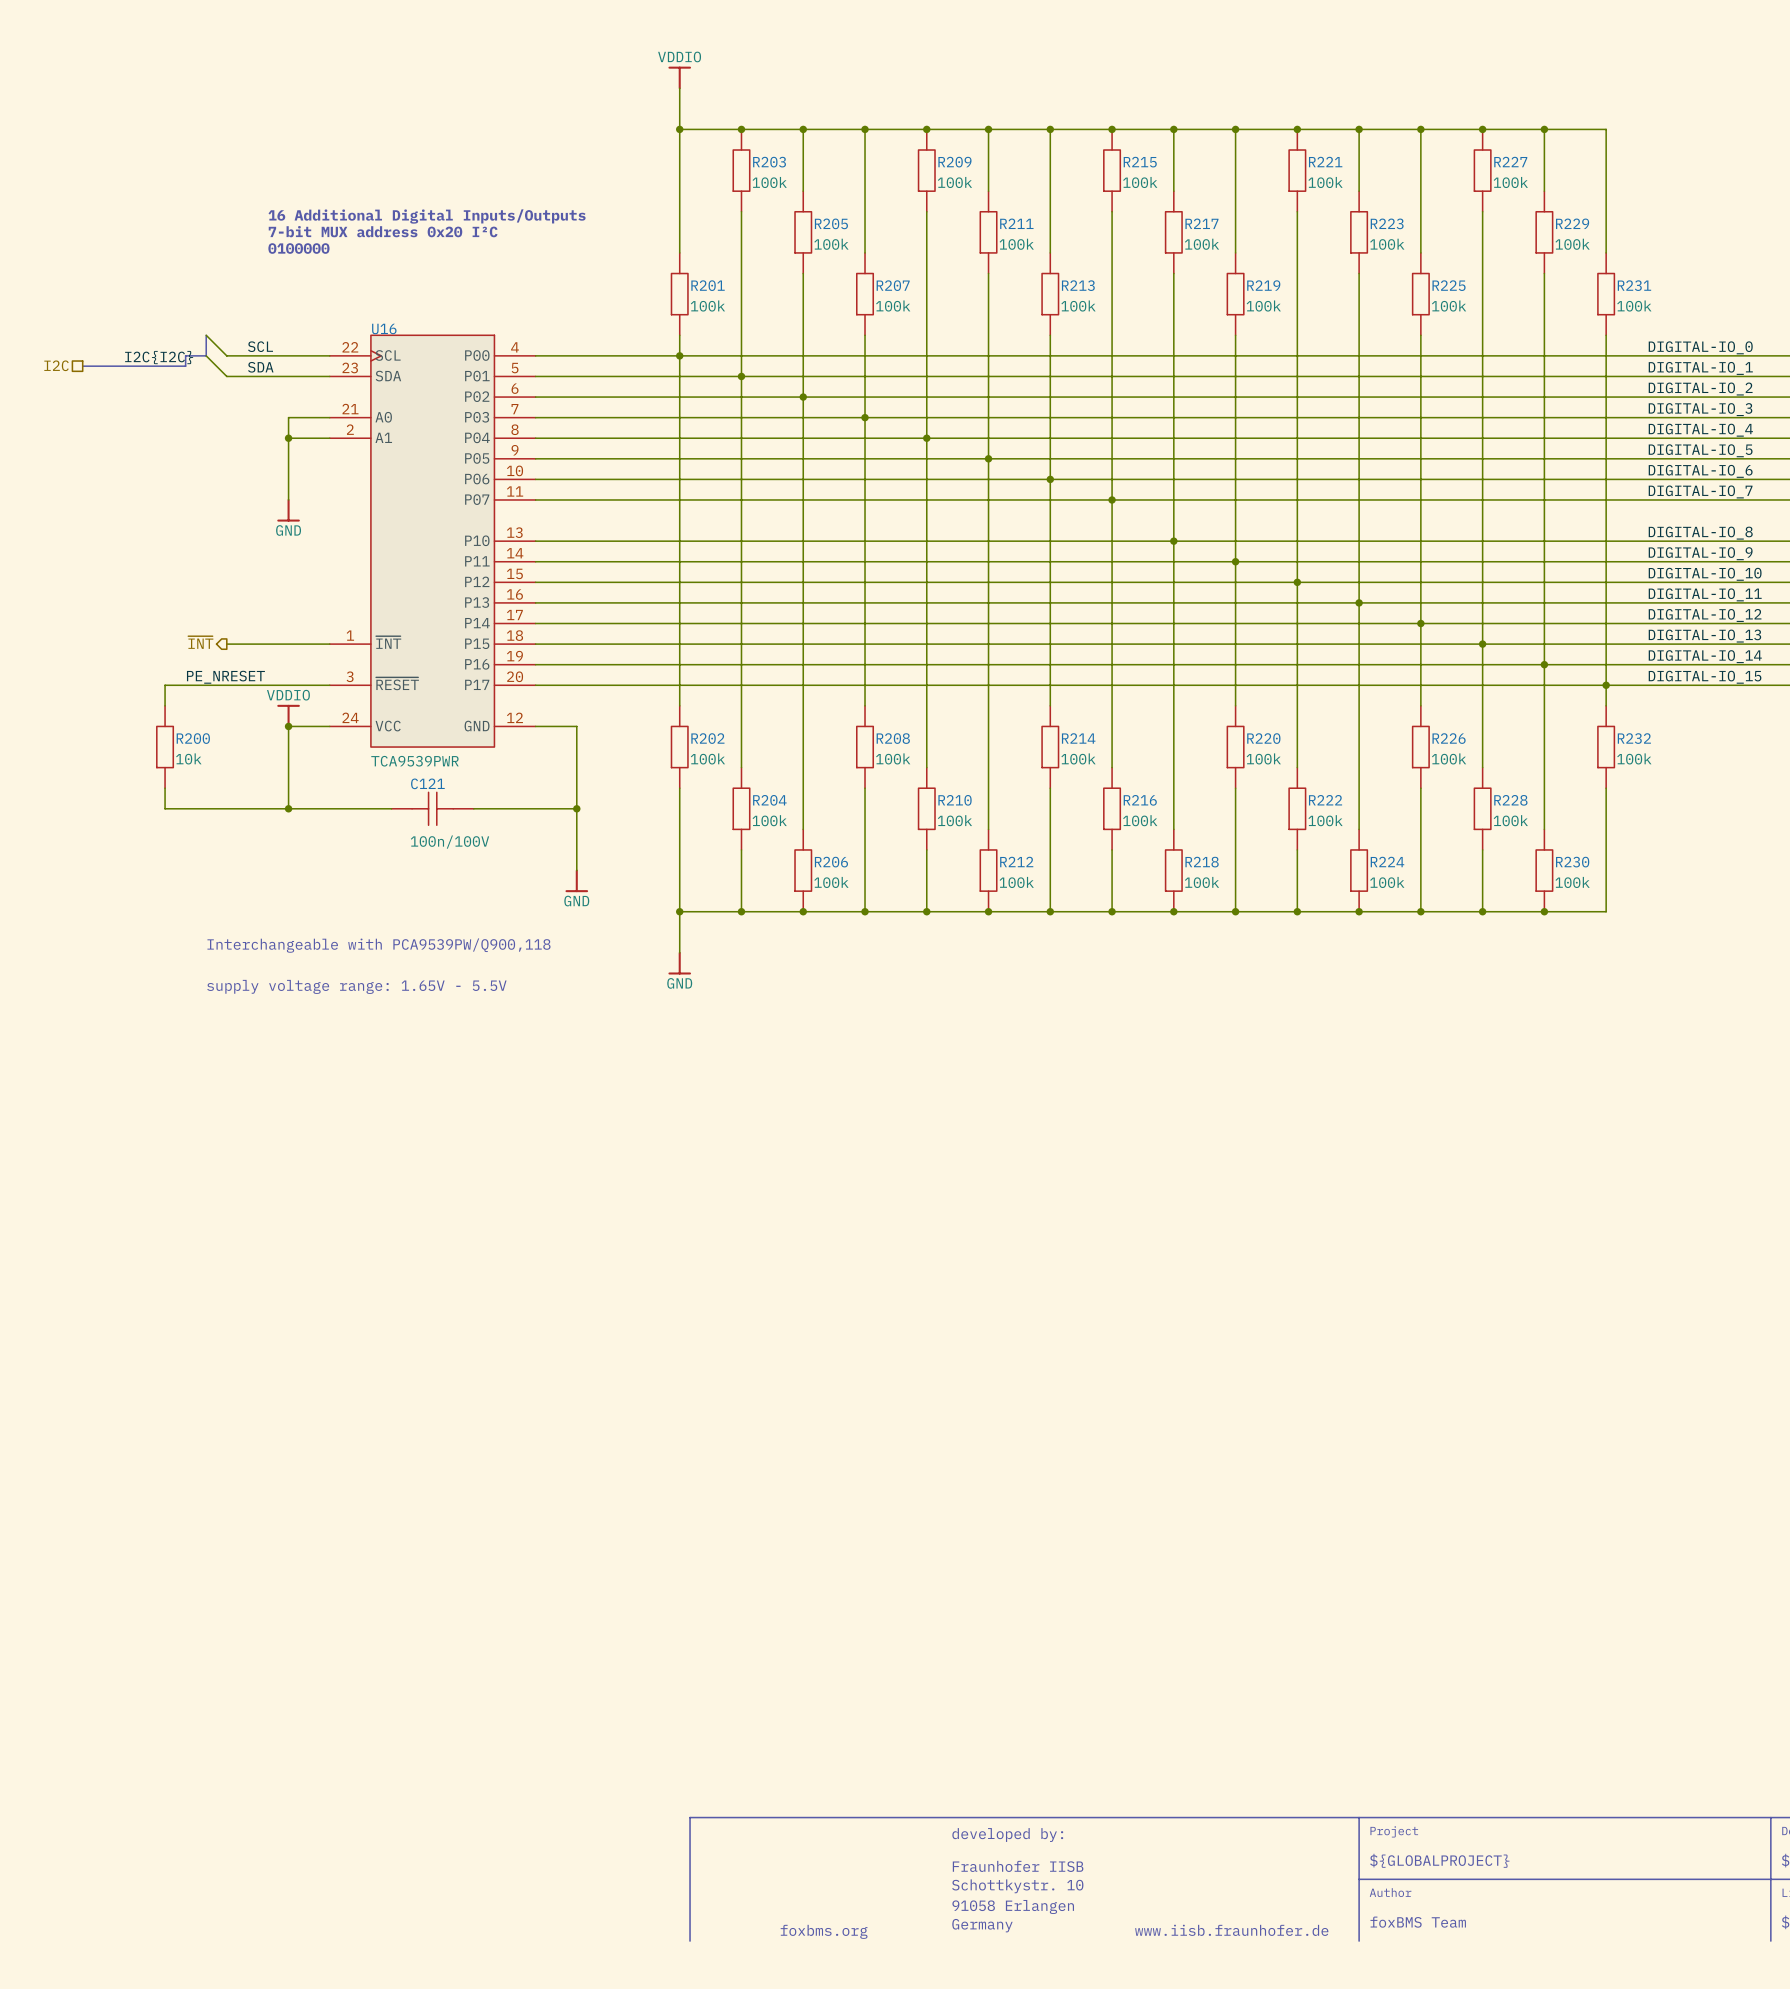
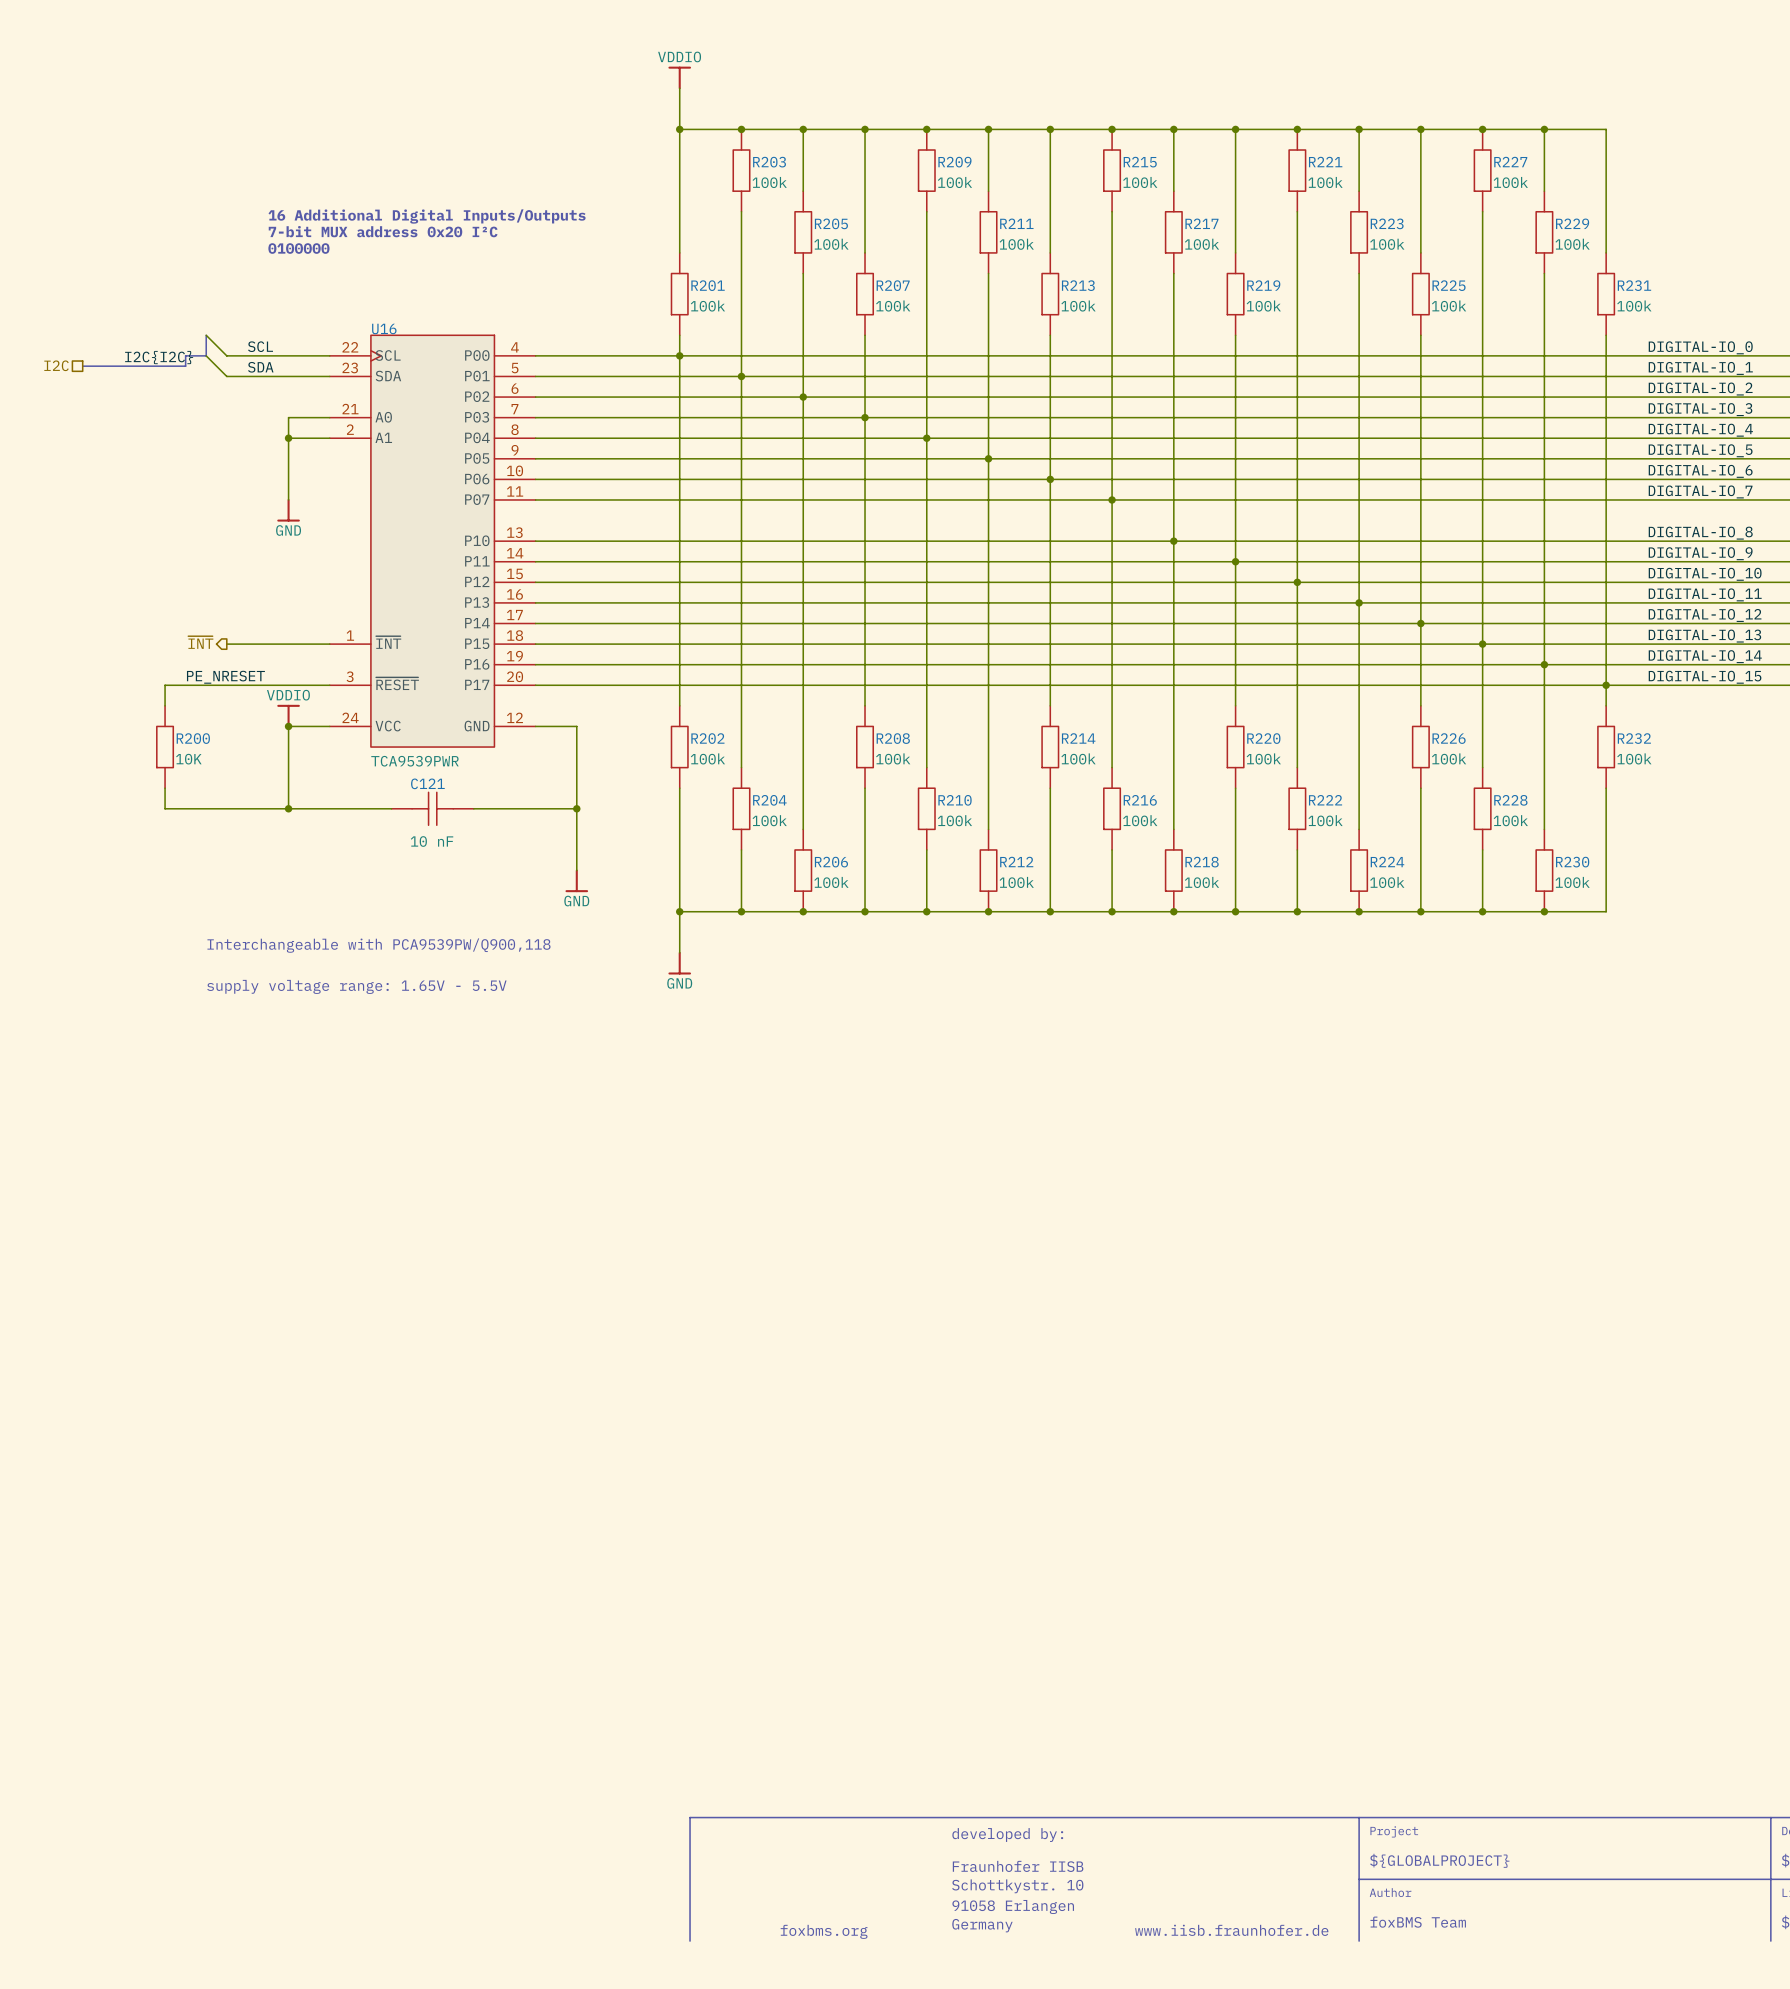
R200 value: 10k (188, 758) -> 10K (188, 759)
C121 value: 100n/100V (449, 842) -> 10 nF (432, 841)

